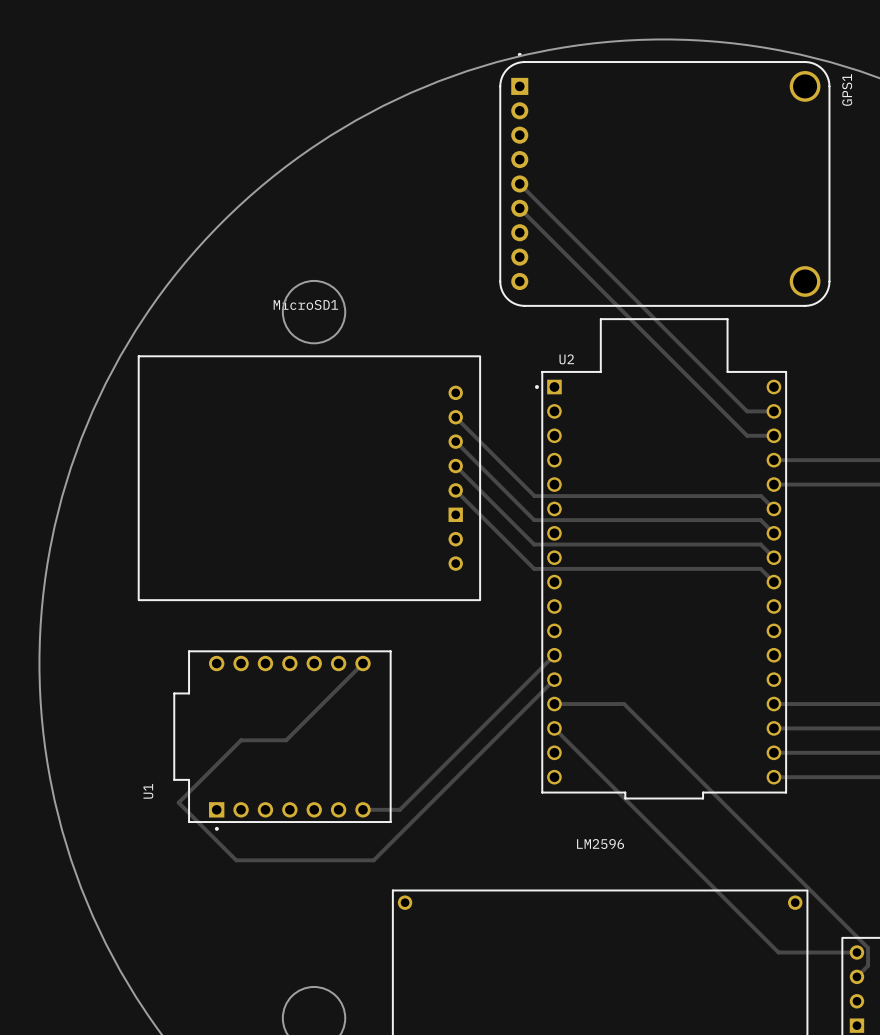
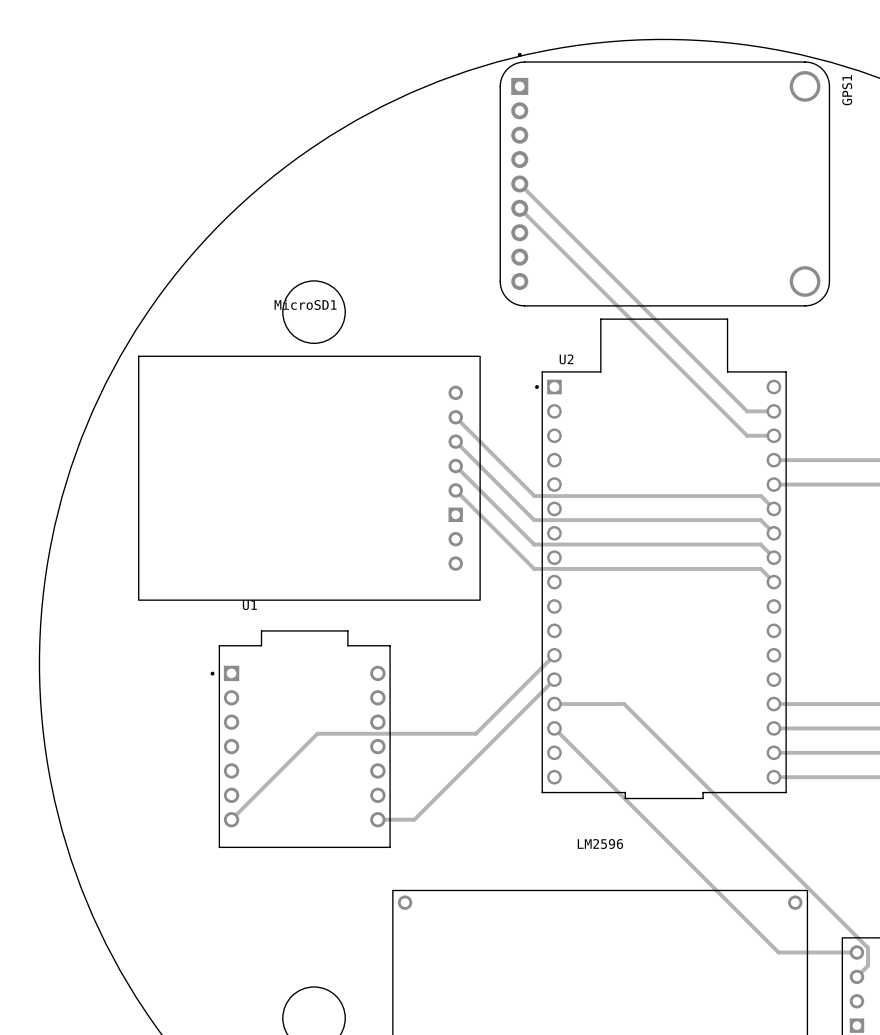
track: (363, 663) (286, 740) (241, 740) (178, 802) (236, 860) (373, 860) (414, 819) -> (377, 819) (414, 819)
track: (475, 733) (399, 809) (363, 809) -> (475, 733) (317, 733) (231, 819)
U1 rotation: 0° (282, 740) -> 90° clockwise (300, 739)

